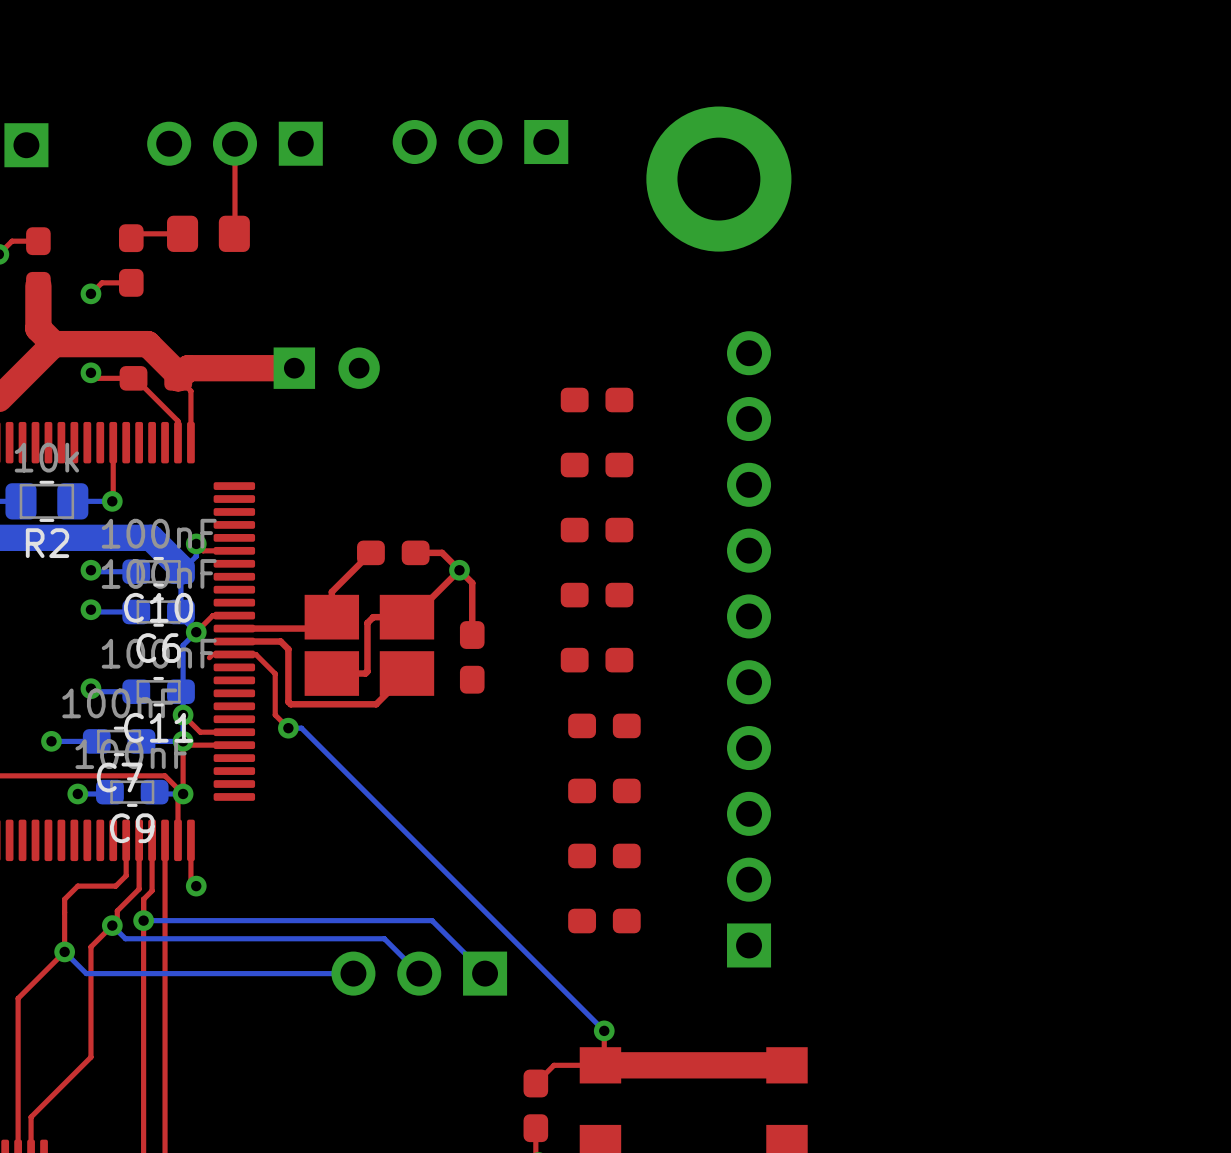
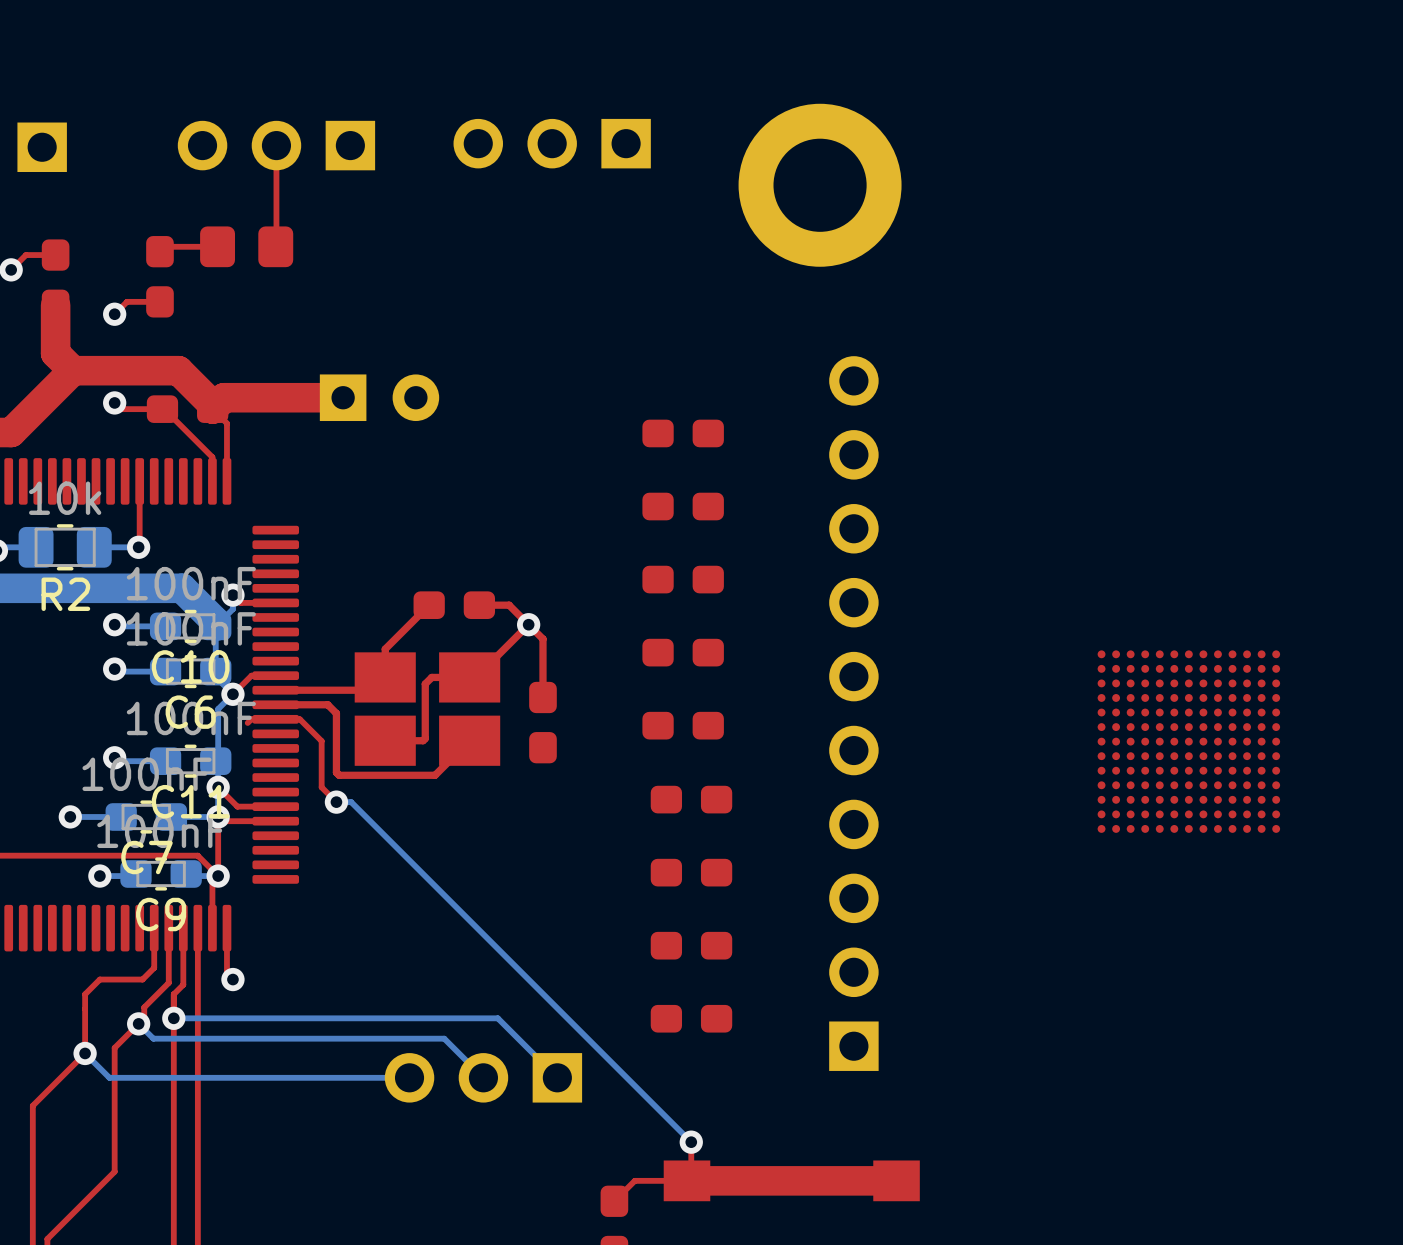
part: none -> (1188, 741)

